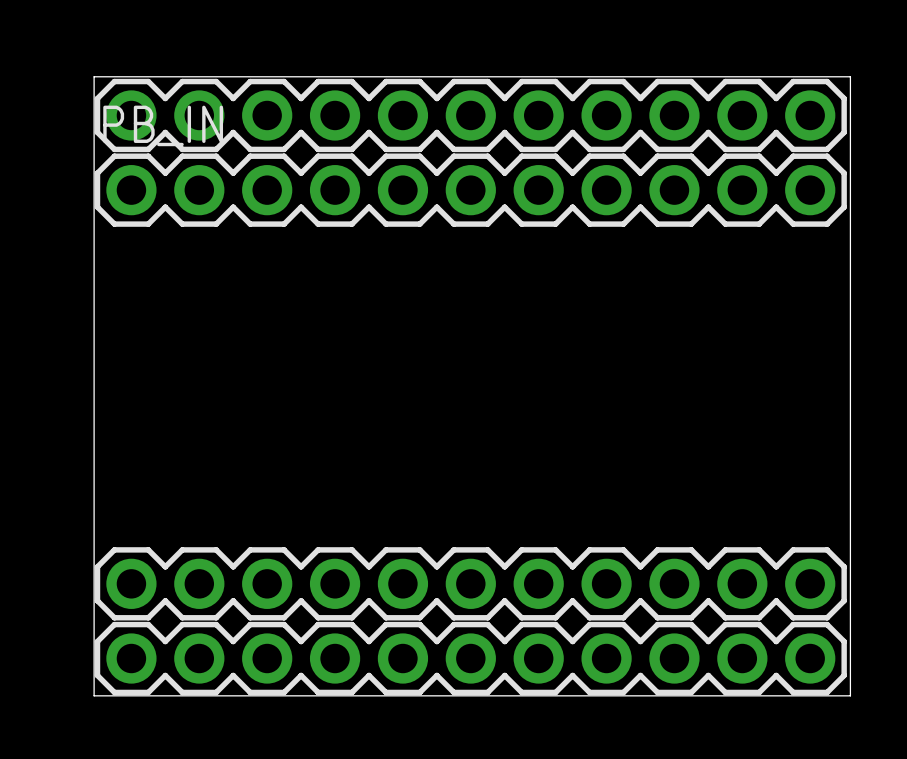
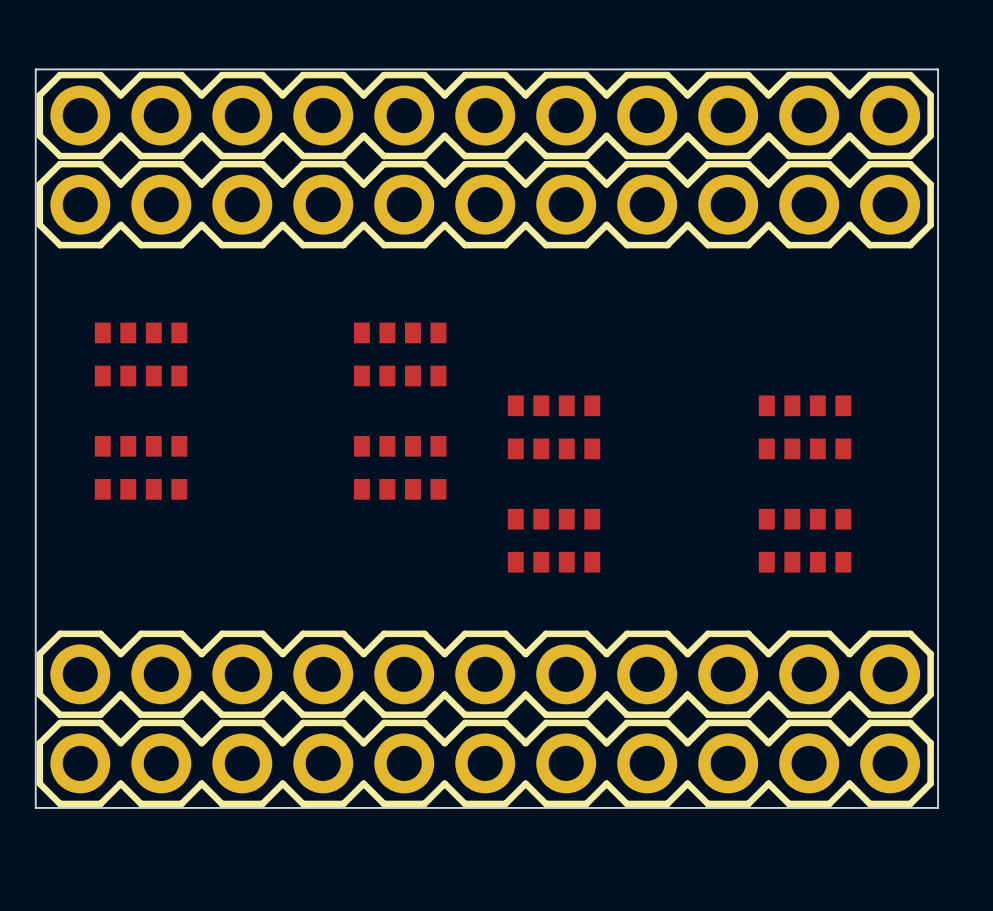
PB_IN name: PB_IN (163, 125) -> none
part: none -> (141, 354)
part: none -> (400, 354)
part: none -> (554, 427)
part: none -> (805, 427)
part: none -> (141, 467)
part: none -> (400, 467)
part: none -> (554, 540)
part: none -> (805, 540)

